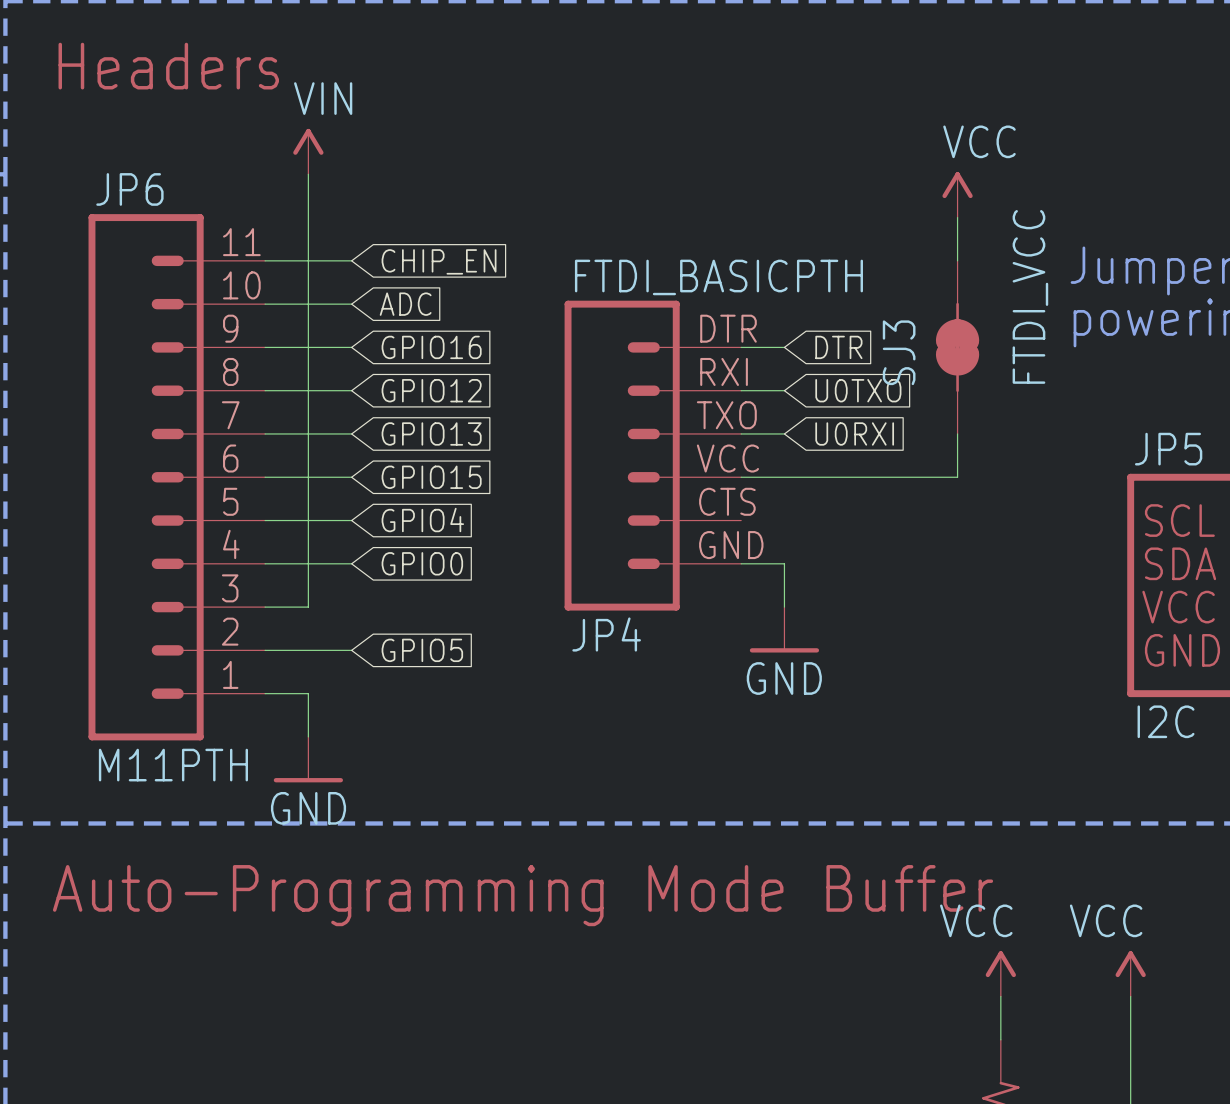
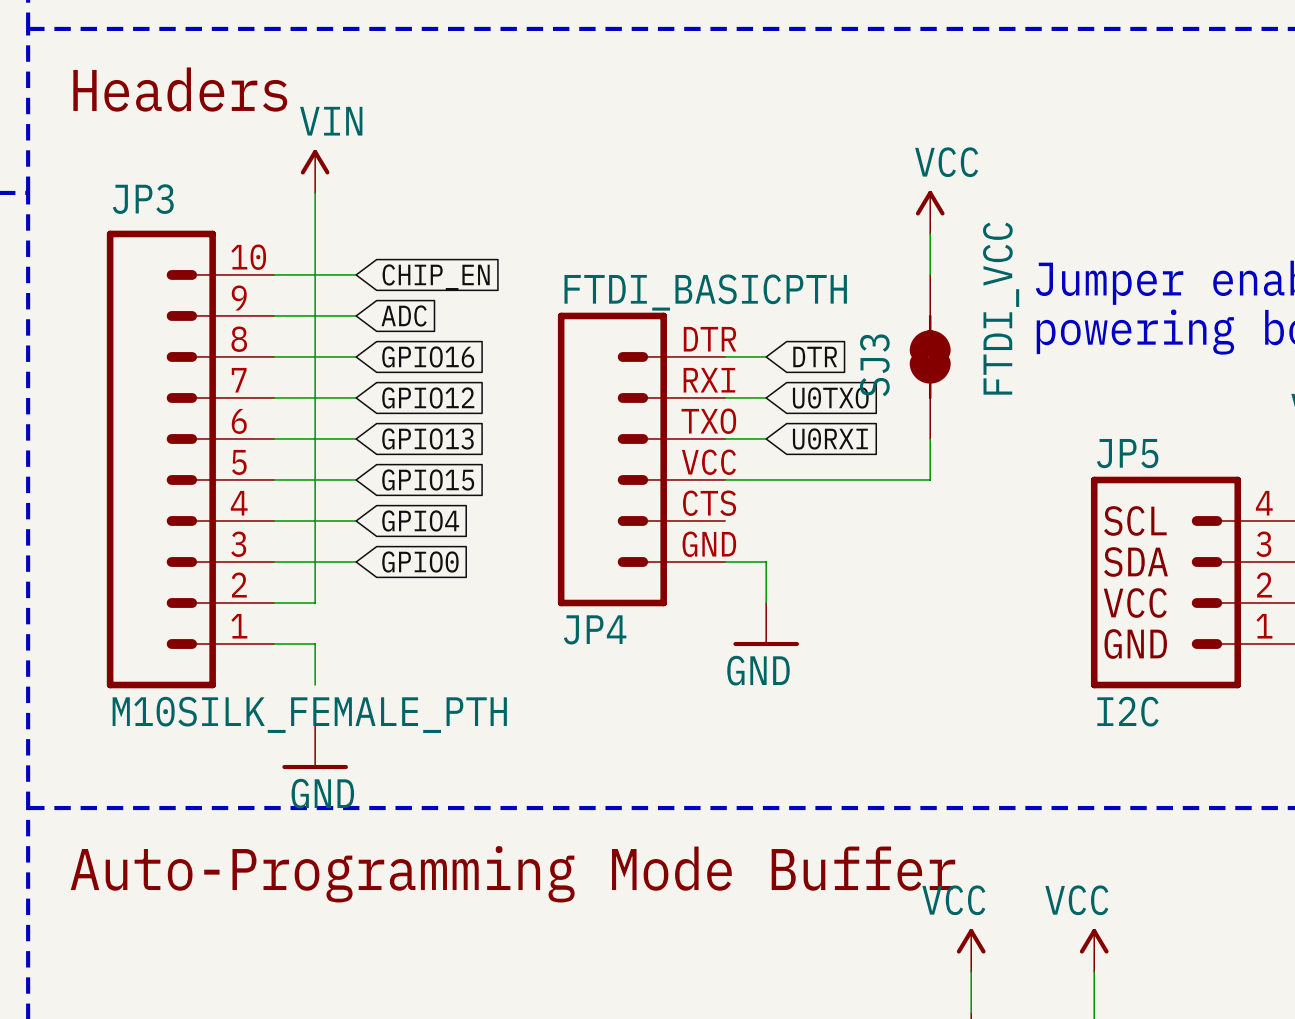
JP3: none -> M10SILK_FEMALE_PTH (190, 459)
JP6: M11PTH (176, 477) -> none
wire: (308, 650) (351, 650) -> (315, 644) (315, 685)
global label: GPIO5 (422, 650) -> none
wire: (265, 693) (308, 693) (308, 736) -> none

